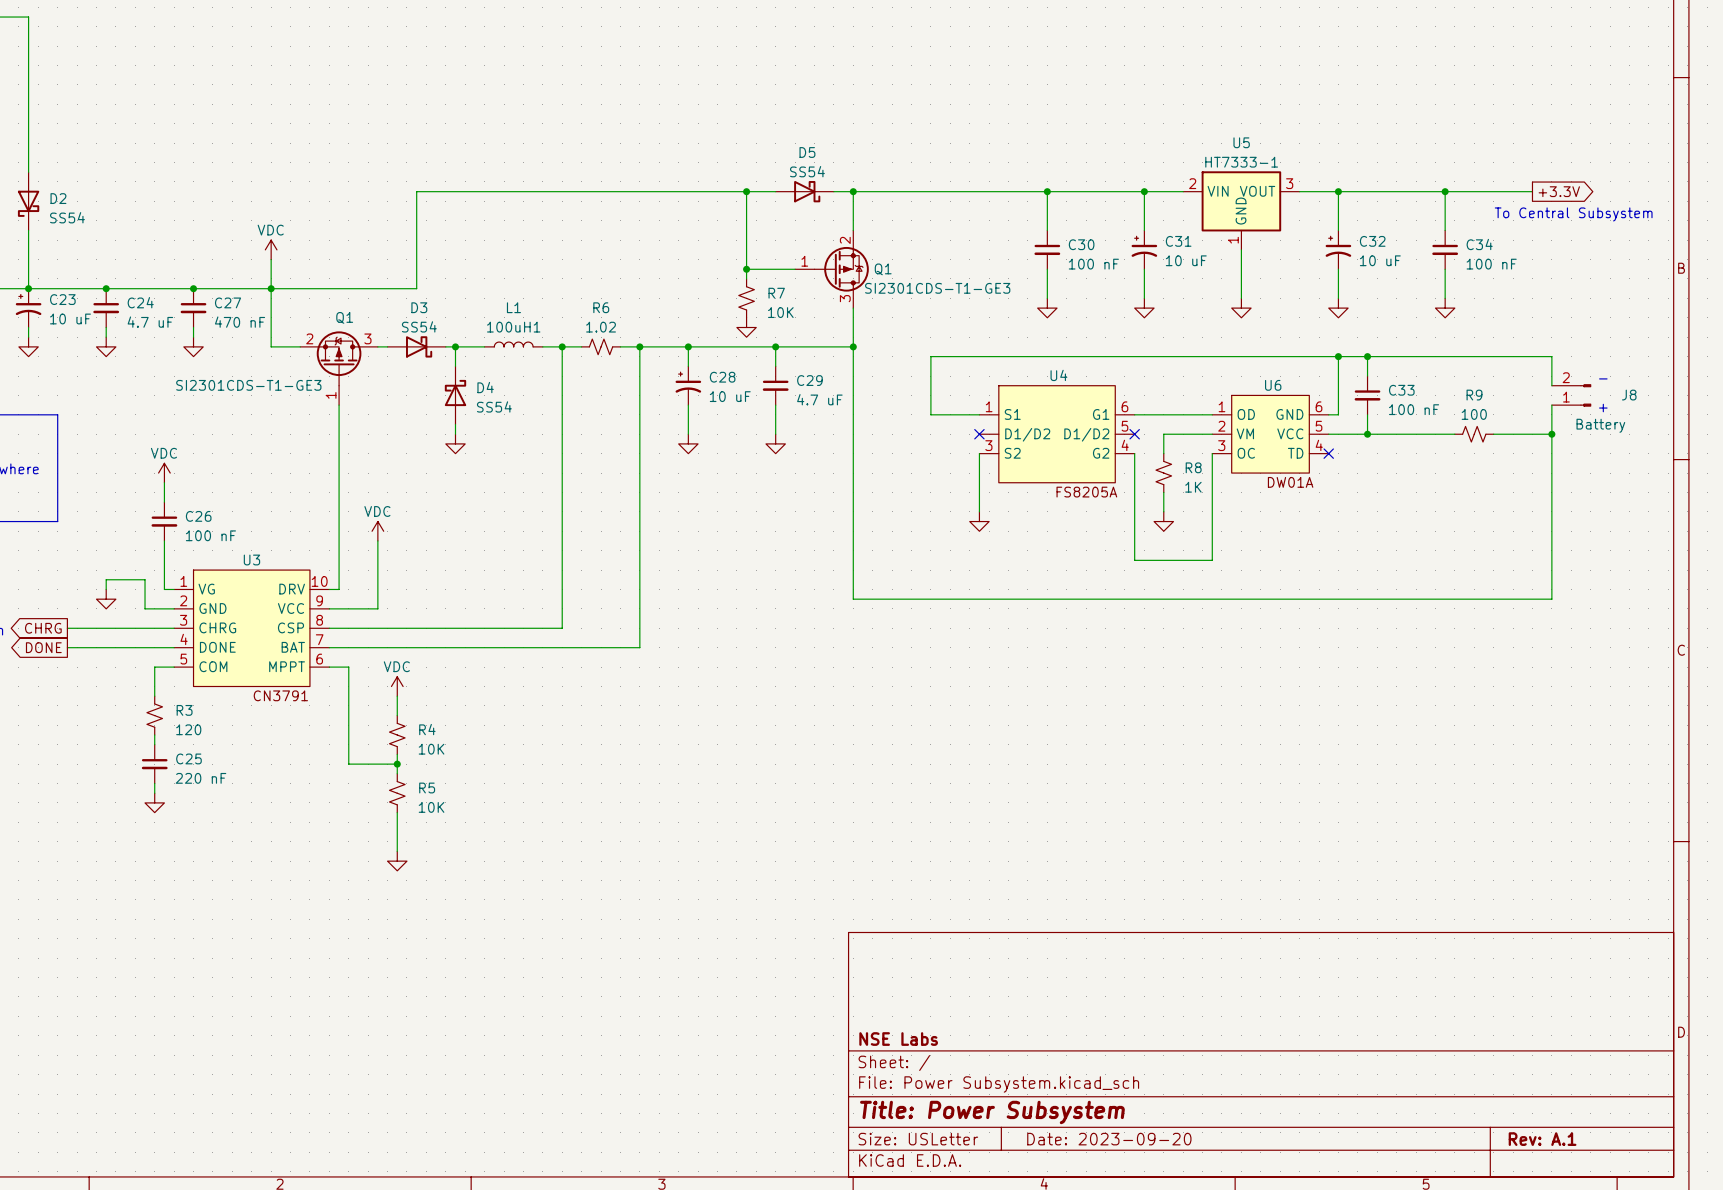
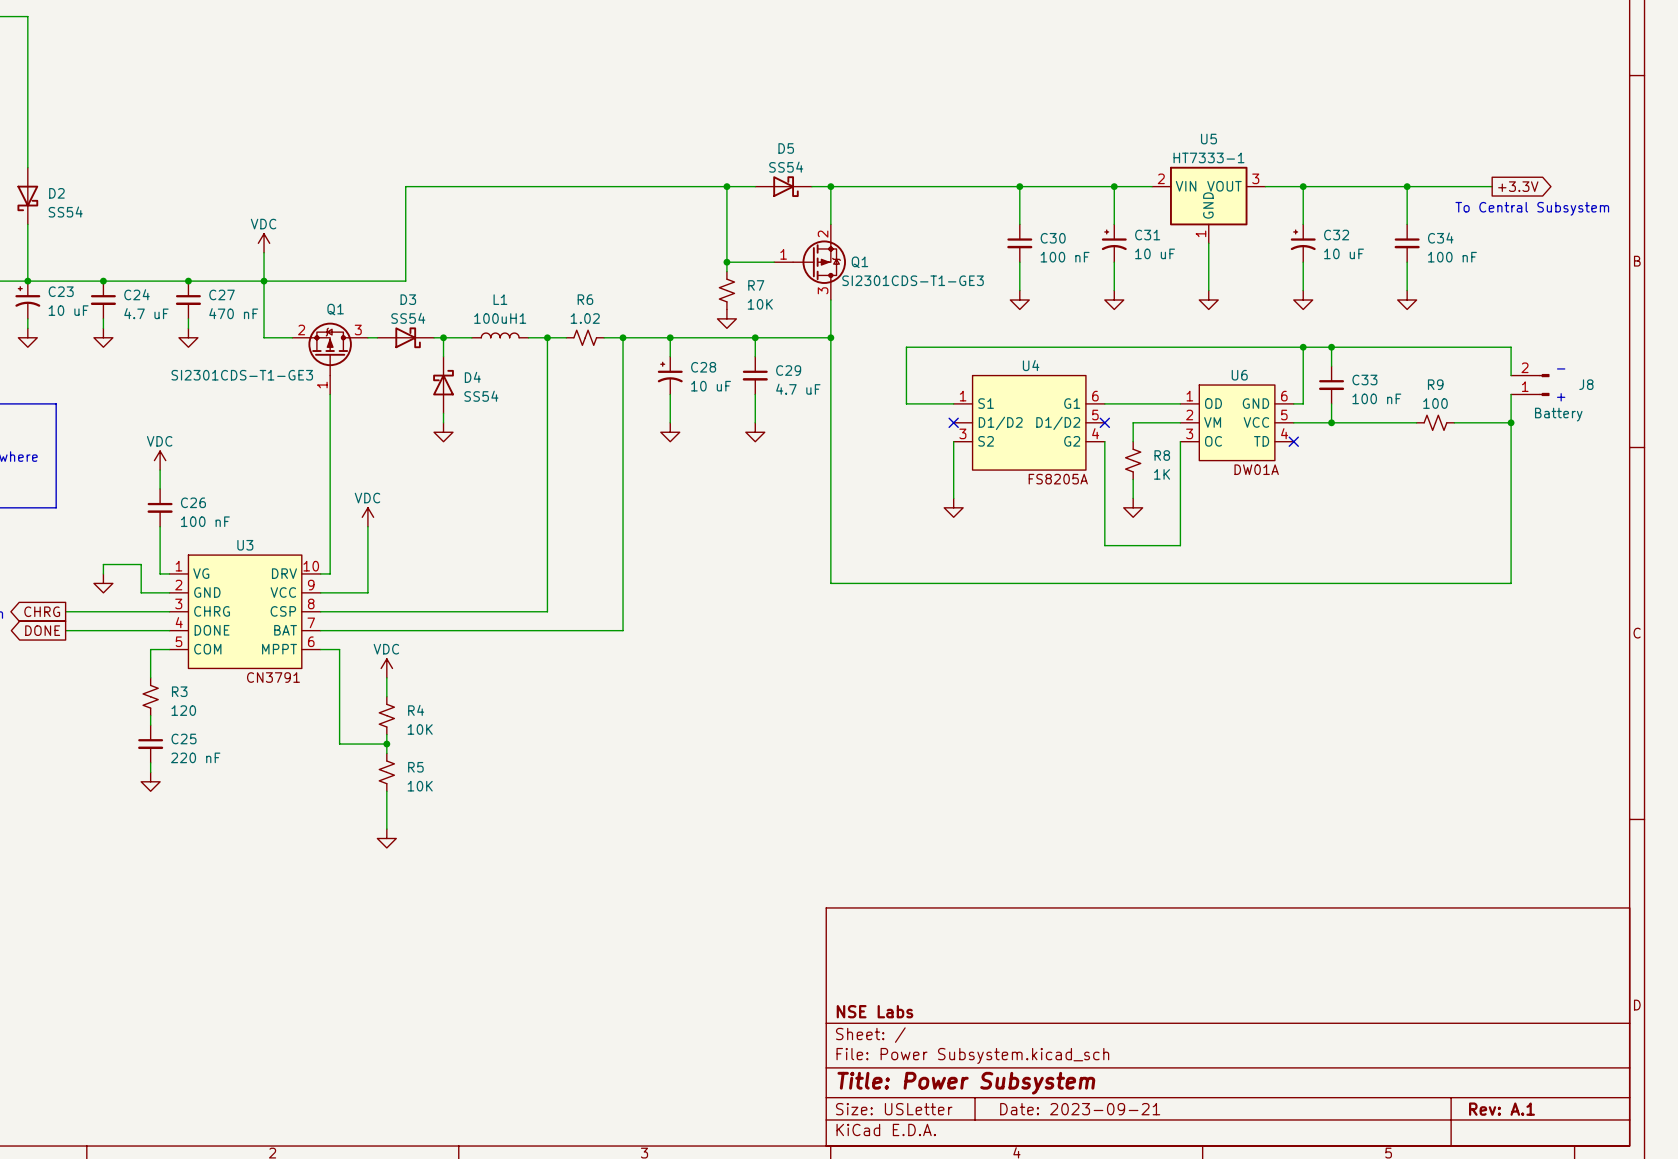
title block: Date: 2023-09-20 (1109, 1139) -> Date: 2023-09-21 (1080, 1109)

